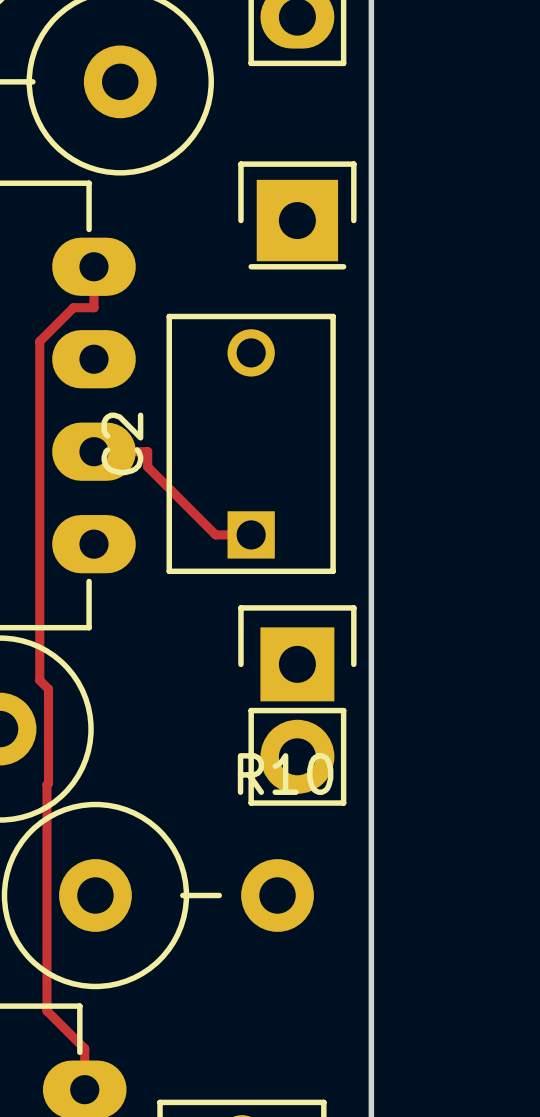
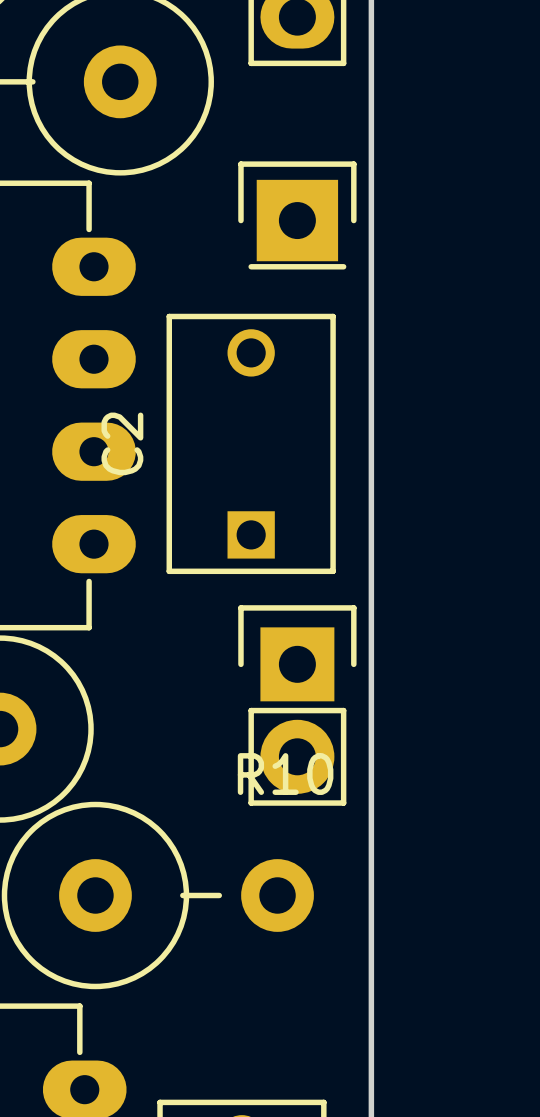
track: (93, 266) (93, 307) (73, 307) (39, 341) (39, 680) (48, 689) (46, 1010) (84, 1048) (84, 1089) -> none
track: (93, 451) (147, 451) (147, 466) (215, 534) (251, 534) -> none

